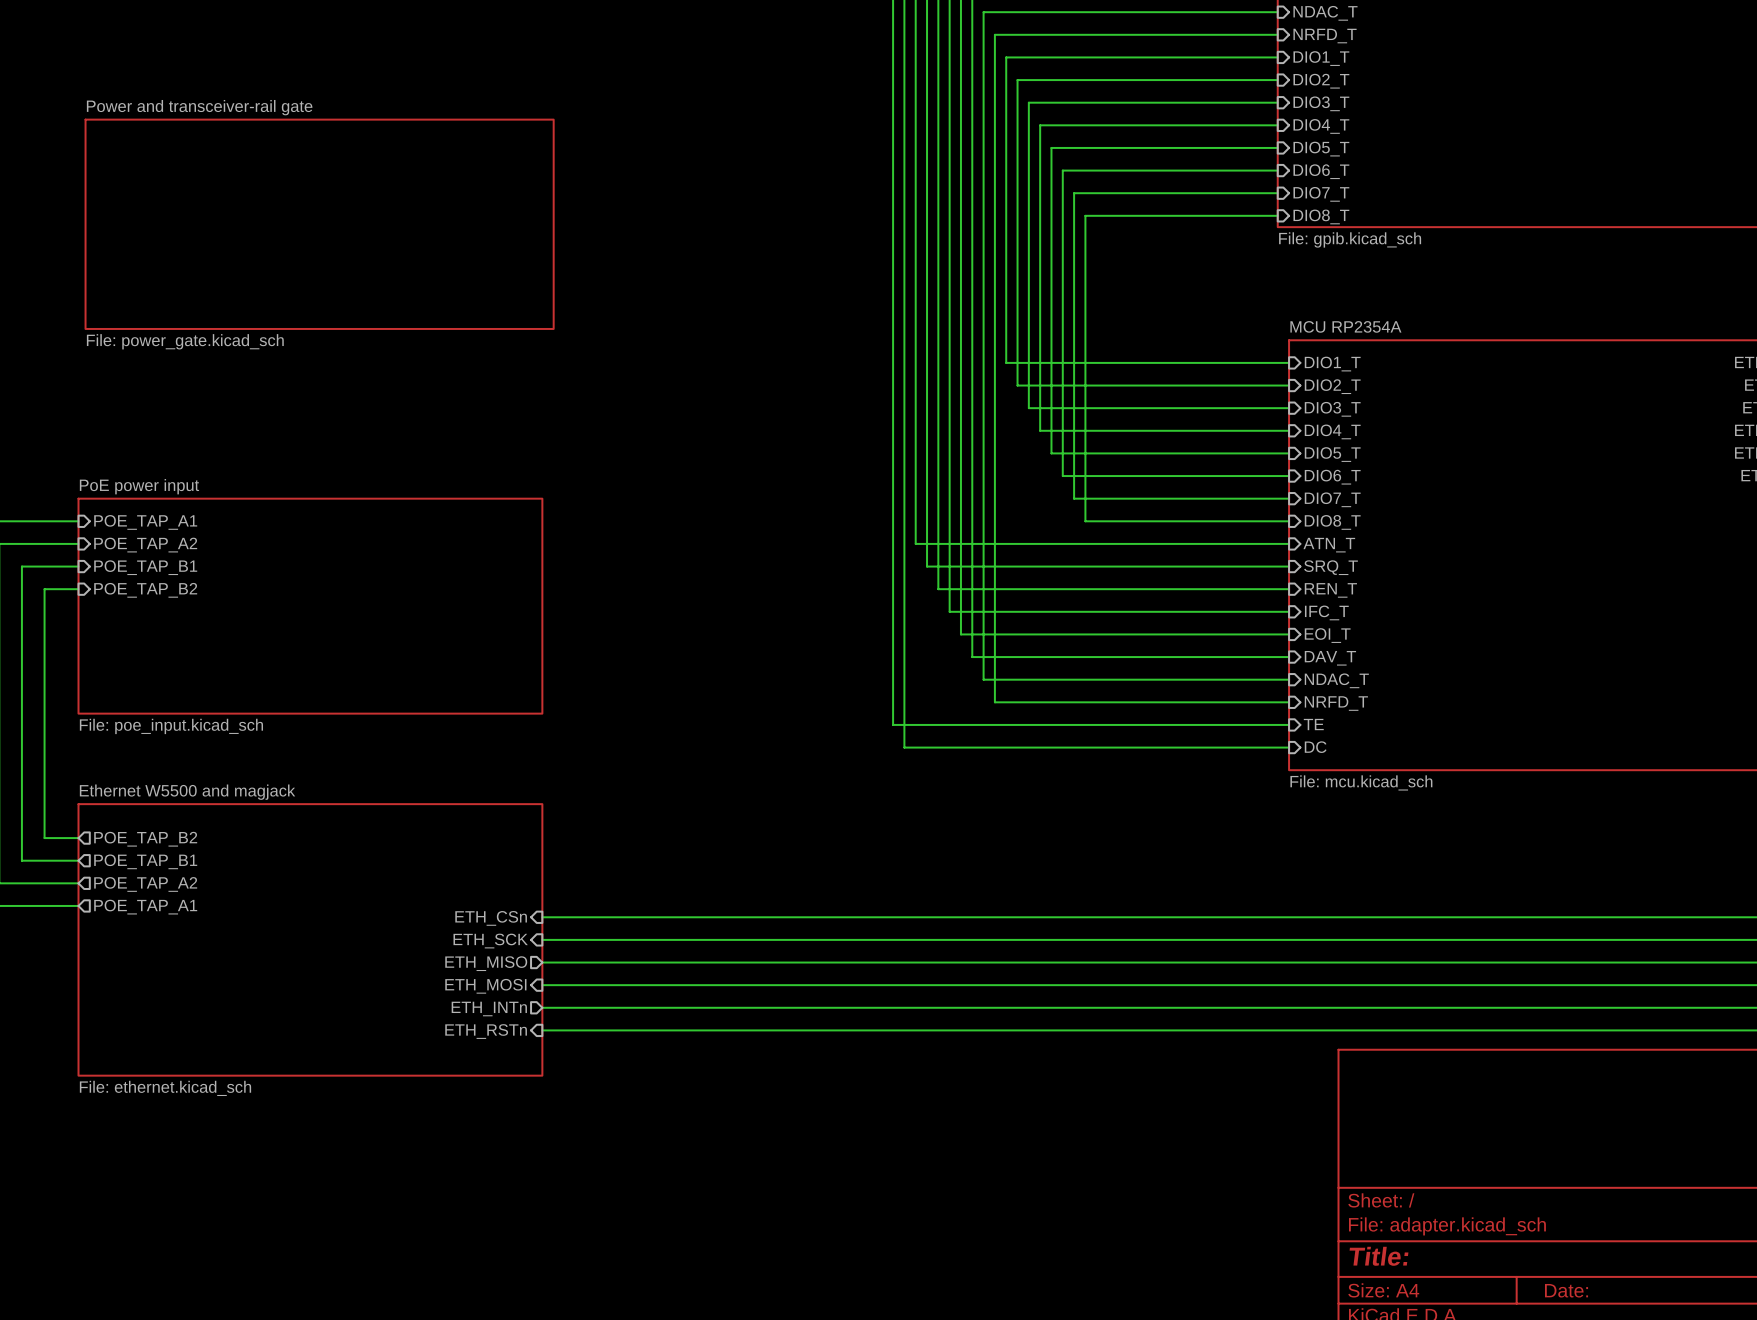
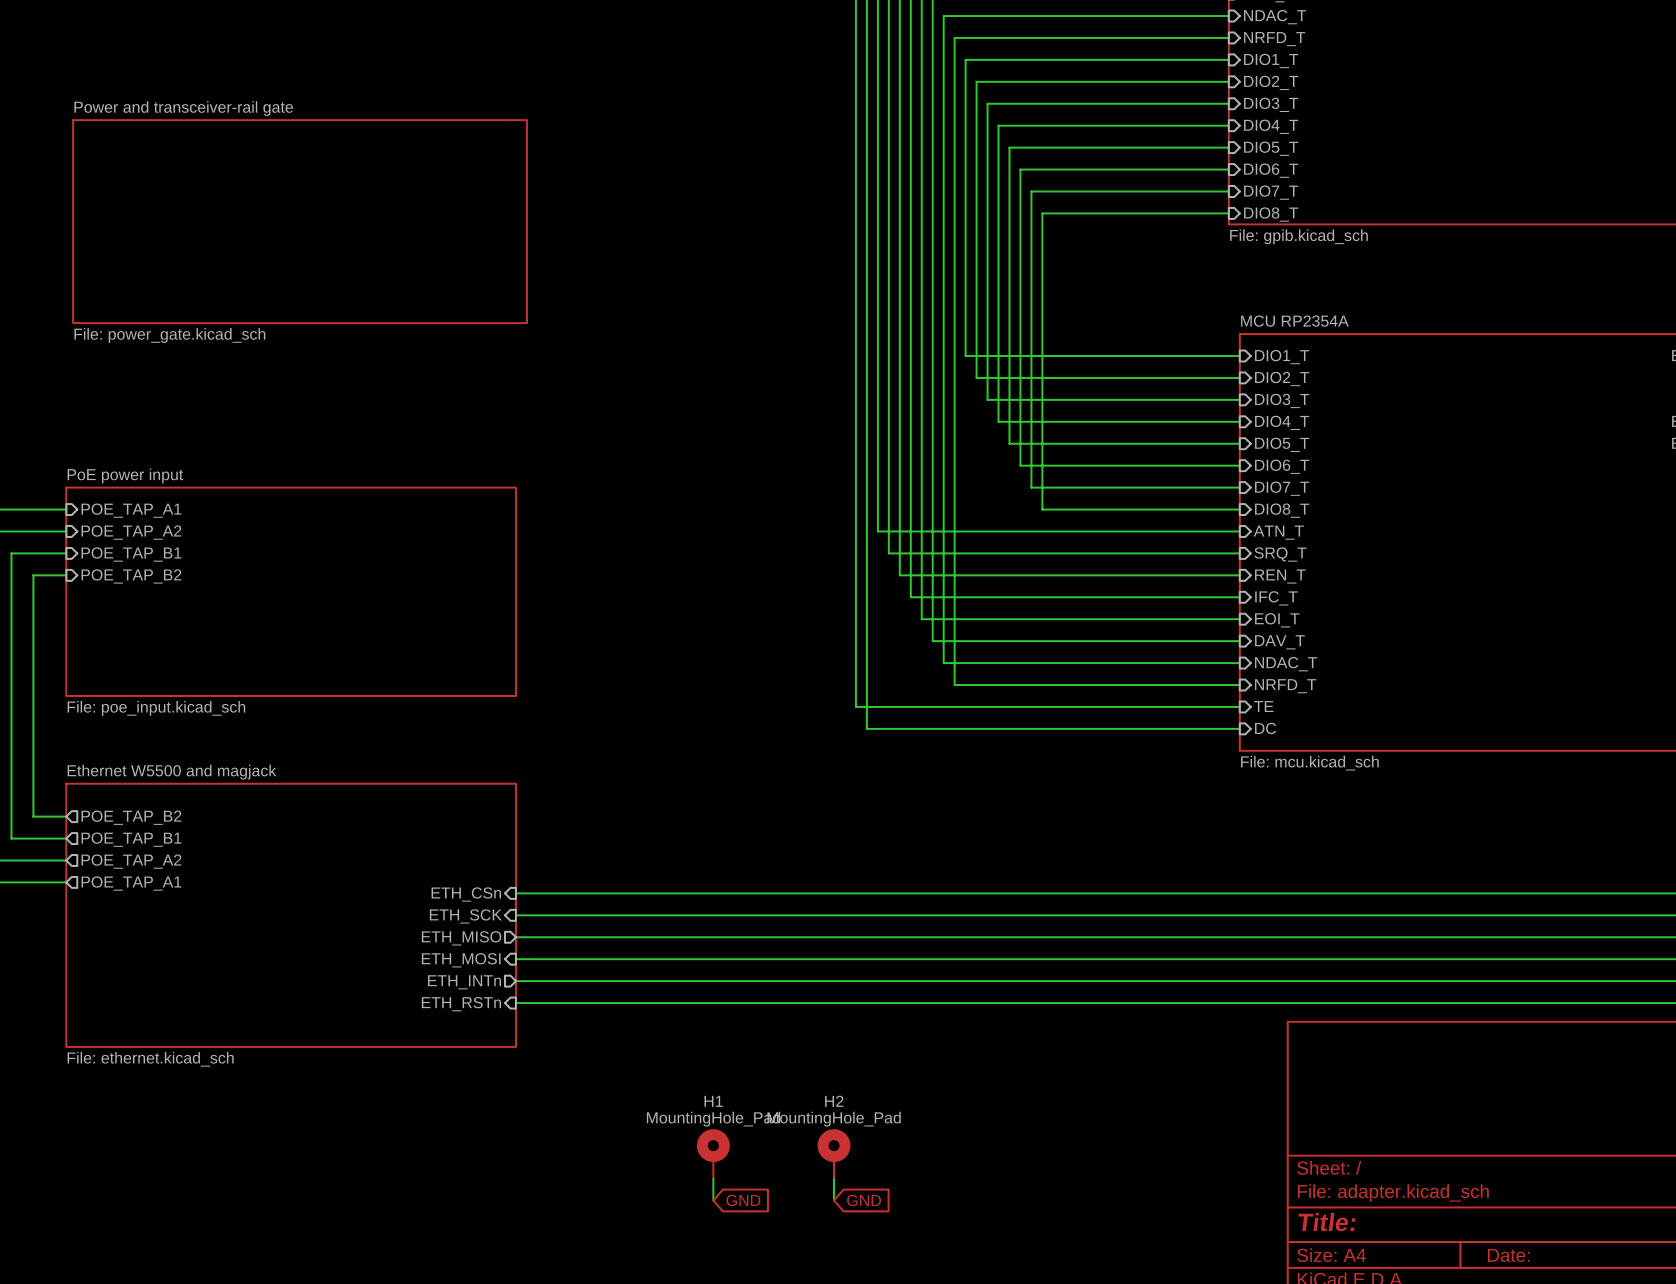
H1: none -> MountingHole_Pad (713, 1153)
H2: none -> MountingHole_Pad (834, 1153)
wire: none -> (713, 1178) (713, 1200)
wire: none -> (834, 1178) (834, 1200)
global label: none -> GND (743, 1200)
global label: none -> GND (864, 1200)

